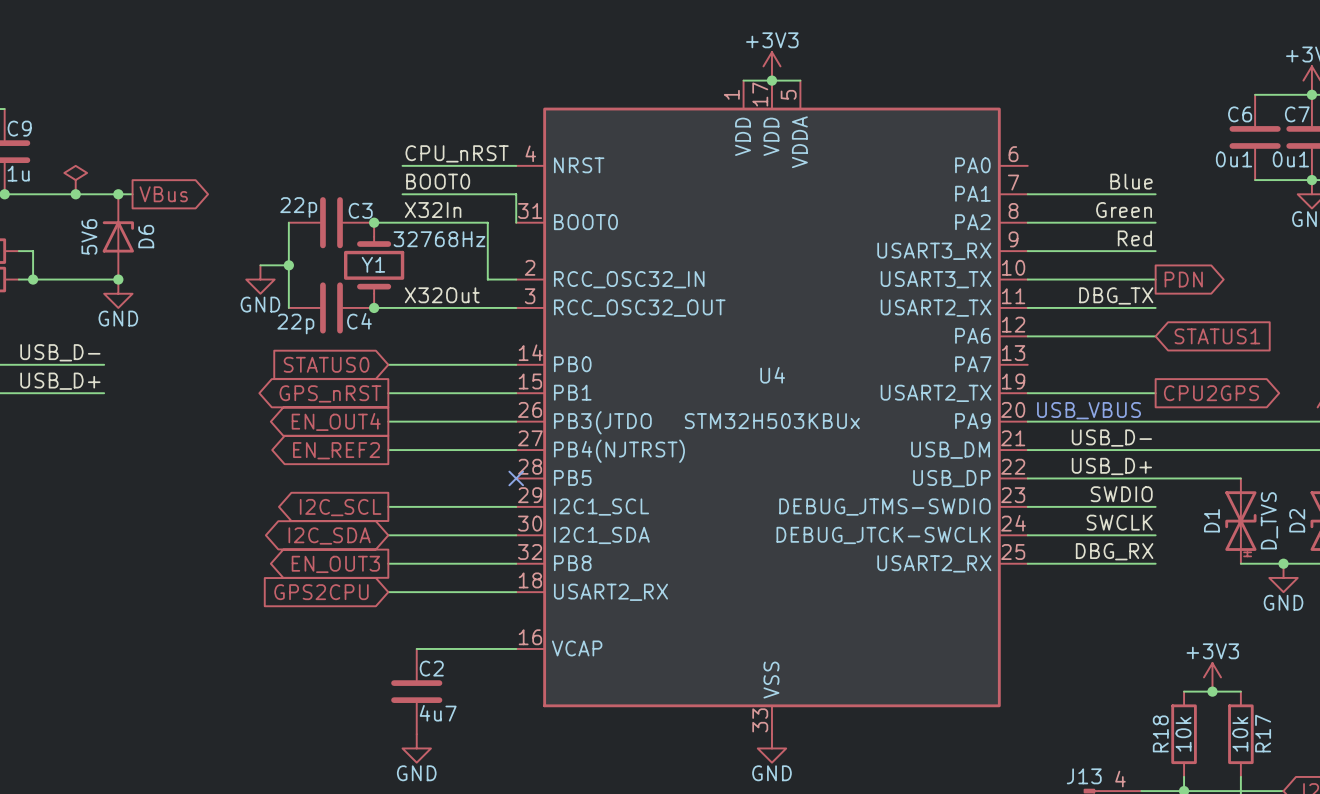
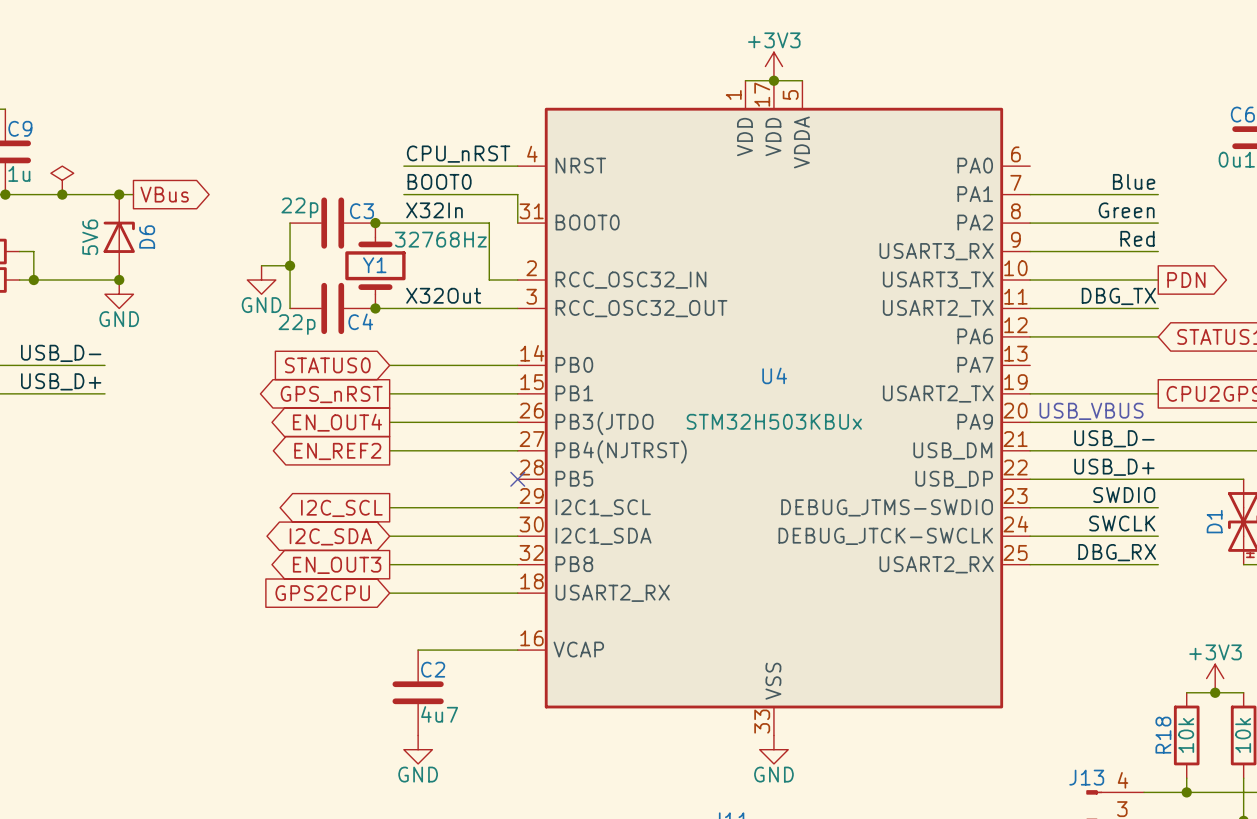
power symbol position: (75, 180) -> (62, 180)
junction position: (75, 194) -> (62, 194)

